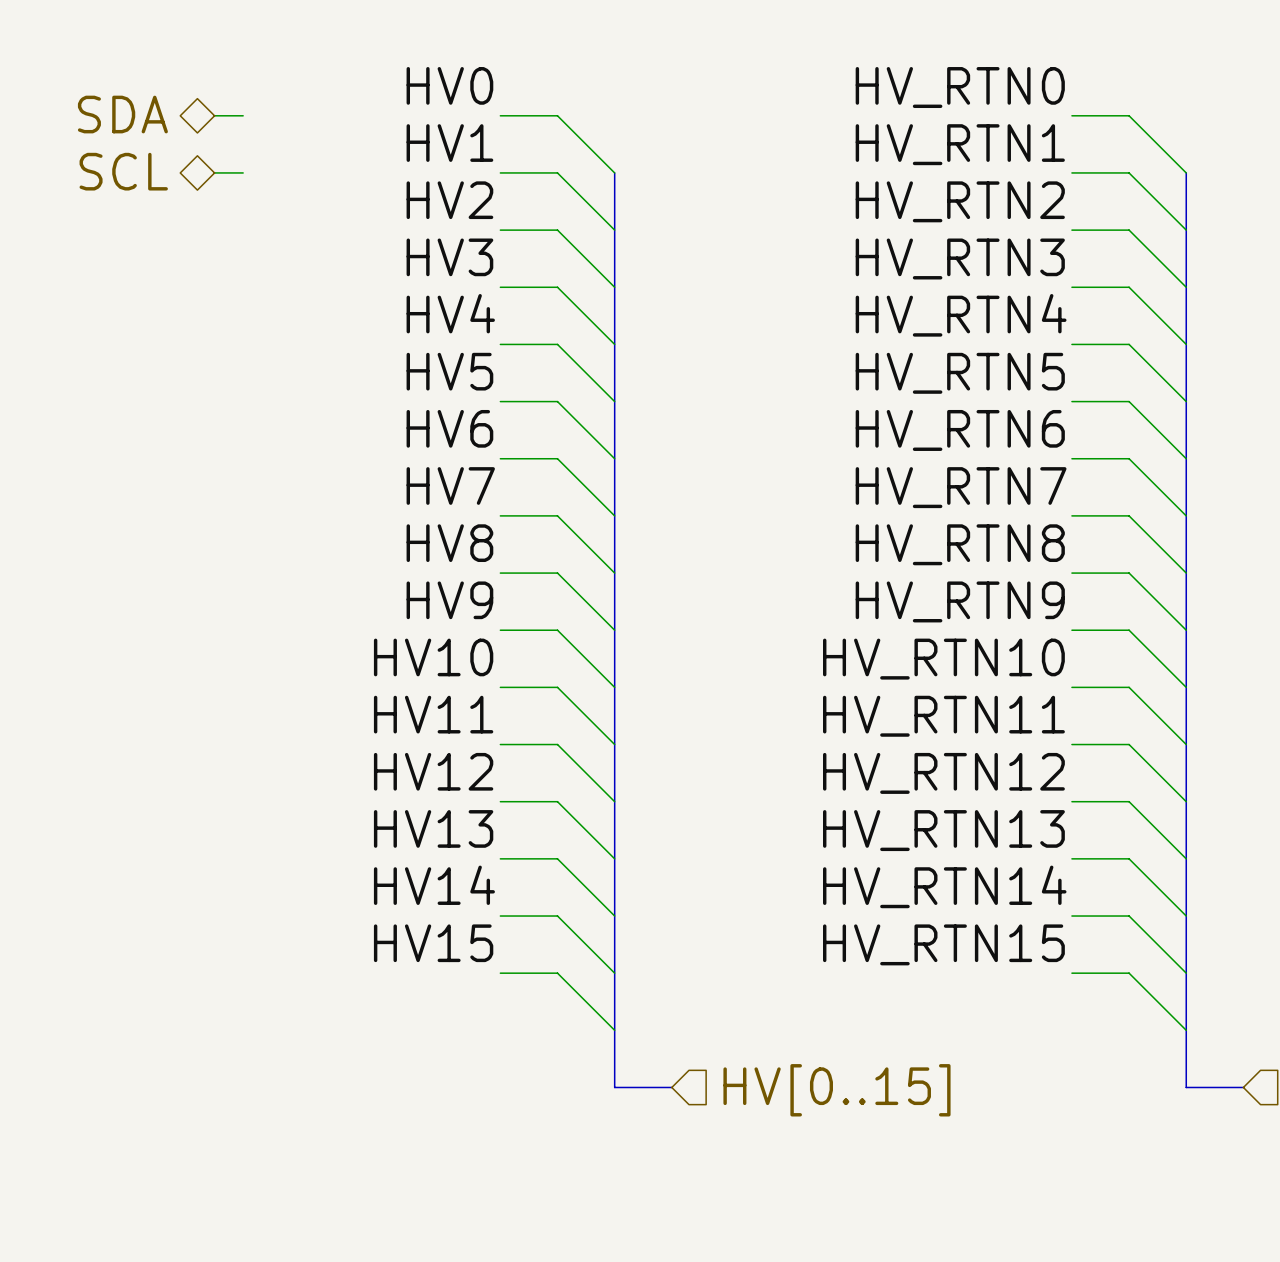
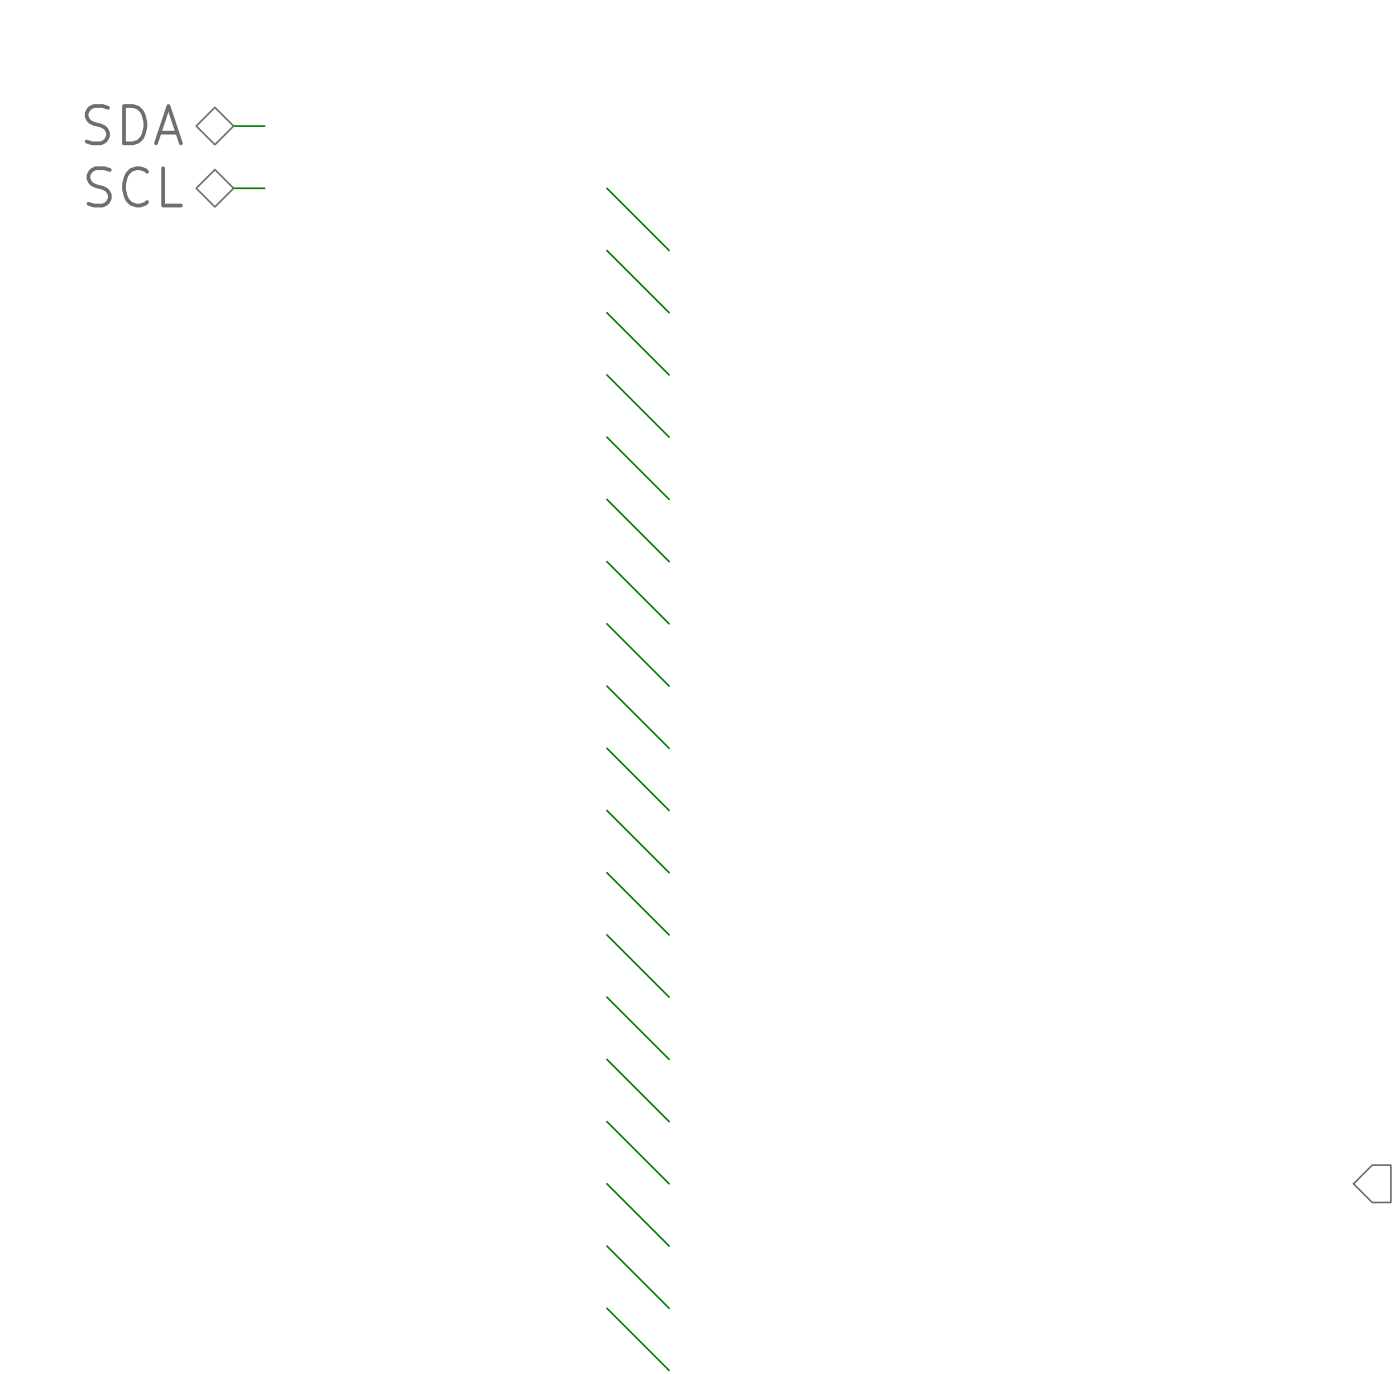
label: HV0 (449, 85) -> none
label: HV_RTN0 (960, 87) -> none
wire: (500, 115) (557, 115) (614, 172) -> none
wire: (1071, 115) (1129, 115) (1186, 172) -> none
label: HV1 (449, 143) -> none
label: HV_RTN1 (960, 144) -> none
wire: (500, 172) (557, 172) -> none
bus: (614, 172) (614, 1087) (671, 1087) -> none
wire: (1071, 172) (1129, 172) (1186, 230) -> none
bus: (1186, 172) (1186, 1087) (1243, 1087) -> none
label: HV2 (449, 200) -> none
label: HV_RTN2 (960, 201) -> none
wire: (500, 230) (557, 230) -> none
wire: (1071, 230) (1129, 230) (1186, 287) -> none
label: HV3 (449, 257) -> none
label: HV_RTN3 (960, 258) -> none
wire: (500, 287) (557, 287) -> none
wire: (1071, 287) (1129, 287) (1186, 344) -> none
label: HV4 (450, 313) -> none
label: HV_RTN4 (961, 315) -> none
wire: (500, 344) (557, 344) -> none
wire: (1071, 344) (1129, 344) (1186, 401) -> none
label: HV5 (449, 371) -> none
label: HV_RTN5 (960, 373) -> none
wire: (500, 401) (557, 401) -> none
wire: (1071, 401) (1129, 401) (1186, 458) -> none
label: HV6 (449, 428) -> none
label: HV_RTN6 (960, 430) -> none
wire: (500, 458) (557, 458) -> none
wire: (1071, 458) (1129, 458) (1186, 515) -> none
label: HV7 (450, 485) -> none
label: HV_RTN7 (961, 487) -> none
wire: (500, 515) (557, 515) -> none
wire: (1071, 515) (1129, 515) (1186, 573) -> none
label: HV8 (449, 543) -> none
label: HV_RTN8 (960, 544) -> none
wire: (500, 573) (557, 573) -> none
wire: (1071, 573) (1129, 573) (1186, 630) -> none
label: HV9 (449, 600) -> none
label: HV_RTN9 (960, 601) -> none
wire: (500, 630) (557, 630) -> none
wire: (1071, 630) (1129, 630) (1186, 687) -> none
label: HV10 (433, 657) -> none
label: HV_RTN10 (943, 659) -> none
wire: (500, 687) (557, 687) -> none
wire: (1071, 687) (1129, 687) (1186, 744) -> none
label: HV11 (433, 714) -> none
label: HV_RTN11 (943, 716) -> none
wire: (500, 744) (557, 744) -> none
wire: (1071, 744) (1129, 744) (1186, 801) -> none
label: HV12 (433, 771) -> none
label: HV_RTN12 (943, 773) -> none
wire: (500, 801) (557, 801) -> none
wire: (1071, 801) (1129, 801) (1186, 858) -> none
label: HV13 (433, 828) -> none
label: HV_RTN13 (943, 830) -> none
wire: (500, 858) (557, 858) -> none
wire: (1071, 858) (1129, 858) (1186, 916) -> none
label: HV14 (434, 885) -> none
label: HV_RTN14 (944, 886) -> none
wire: (500, 916) (557, 916) -> none
wire: (1071, 916) (1129, 916) (1186, 973) -> none
label: HV15 (433, 943) -> none
label: HV_RTN15 (943, 944) -> none
wire: (500, 973) (557, 973) -> none
wire: (1071, 973) (1129, 973) (1186, 1030) -> none
wire: none -> (606, 1121) (669, 1183)
wire: none -> (606, 1183) (669, 1246)
hierarchical label: HV[0..15] (836, 1090) -> none
wire: none -> (606, 1246) (669, 1308)
wire: none -> (606, 1308) (669, 1370)

